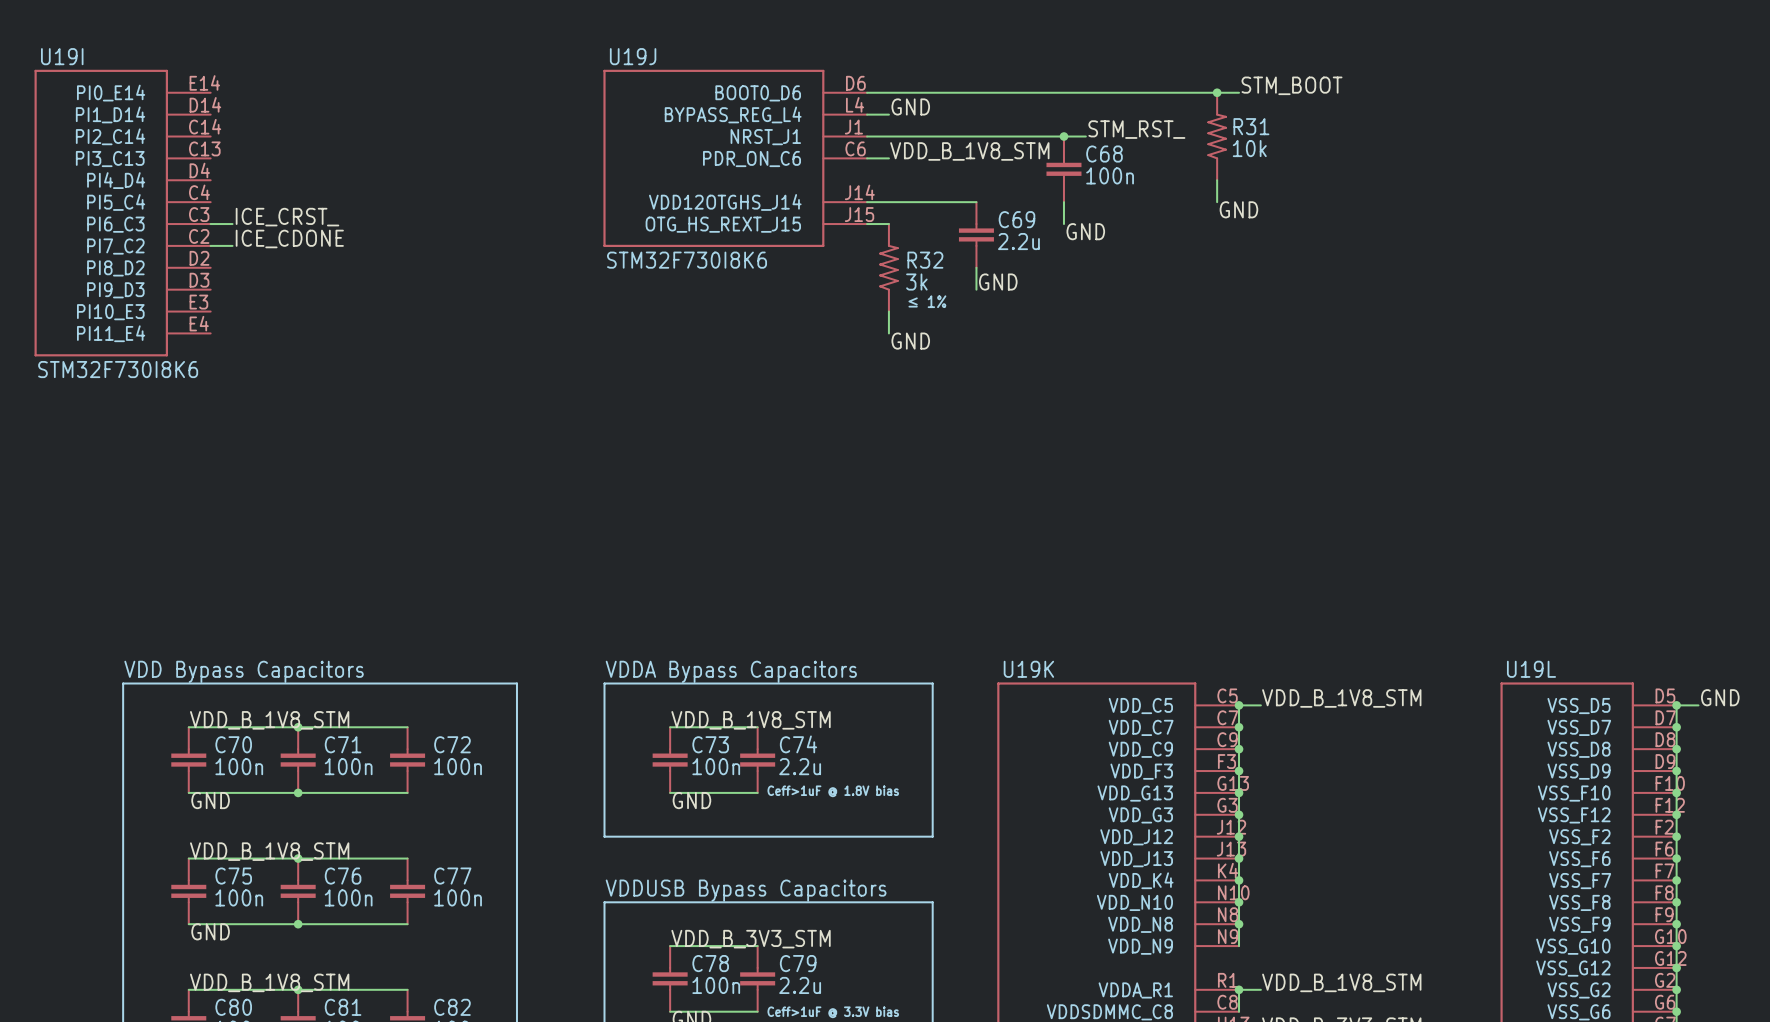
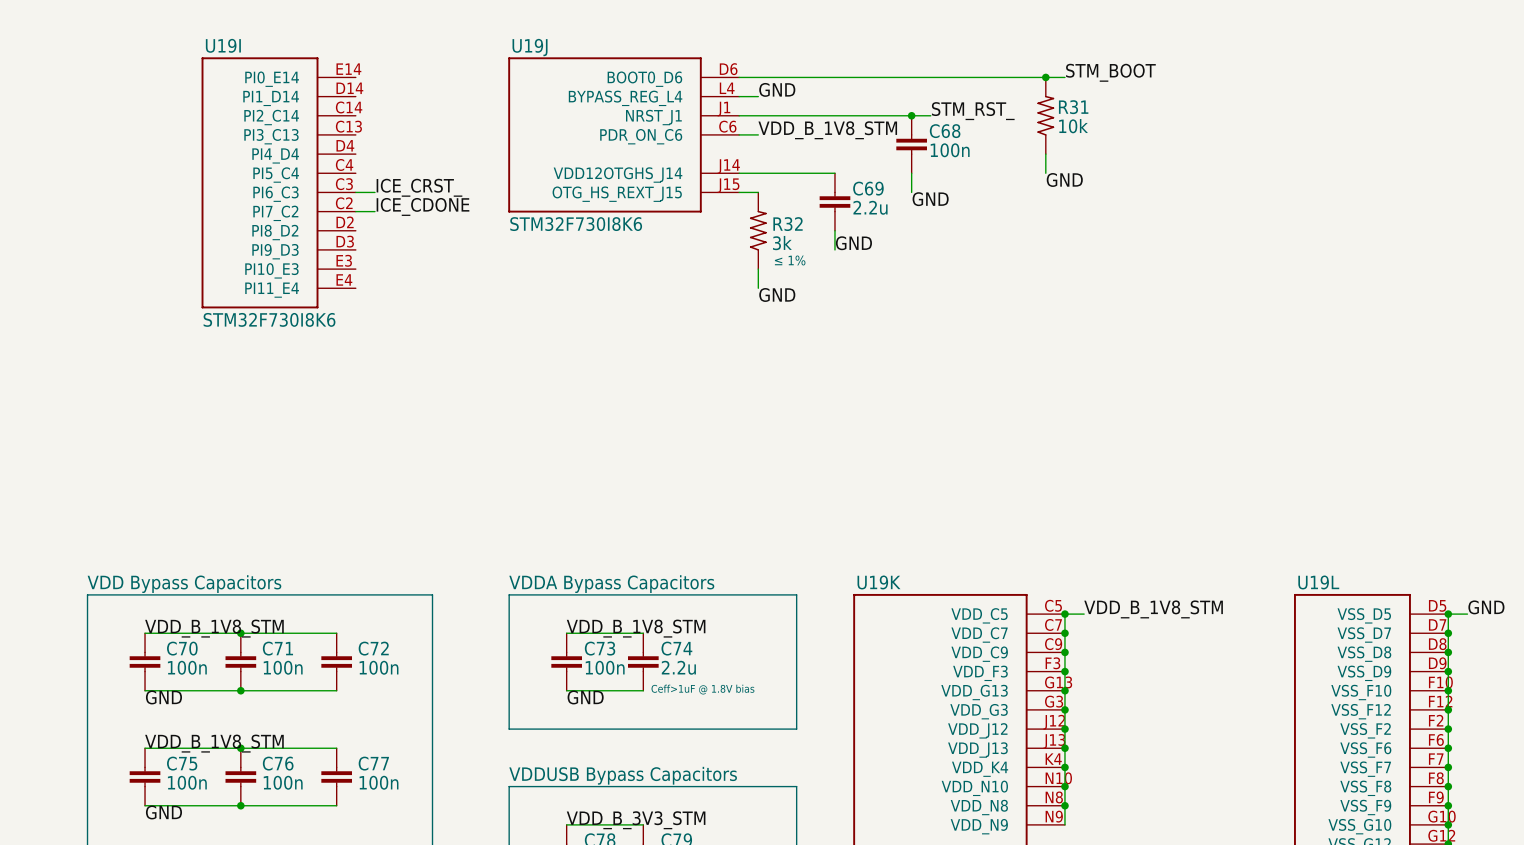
U19I position: (122, 213) -> (278, 182)
label: ICE_CRST_ (287, 217) -> none
label: none -> ICE_CRST_ (419, 187)
wire: (210, 224) (232, 224) -> none
wire: none -> (355, 192) (375, 192)
label: ICE_CDONE (289, 238) -> none
label: none -> ICE_CDONE (422, 206)
wire: (210, 245) (232, 245) -> none
wire: none -> (355, 211) (375, 211)

